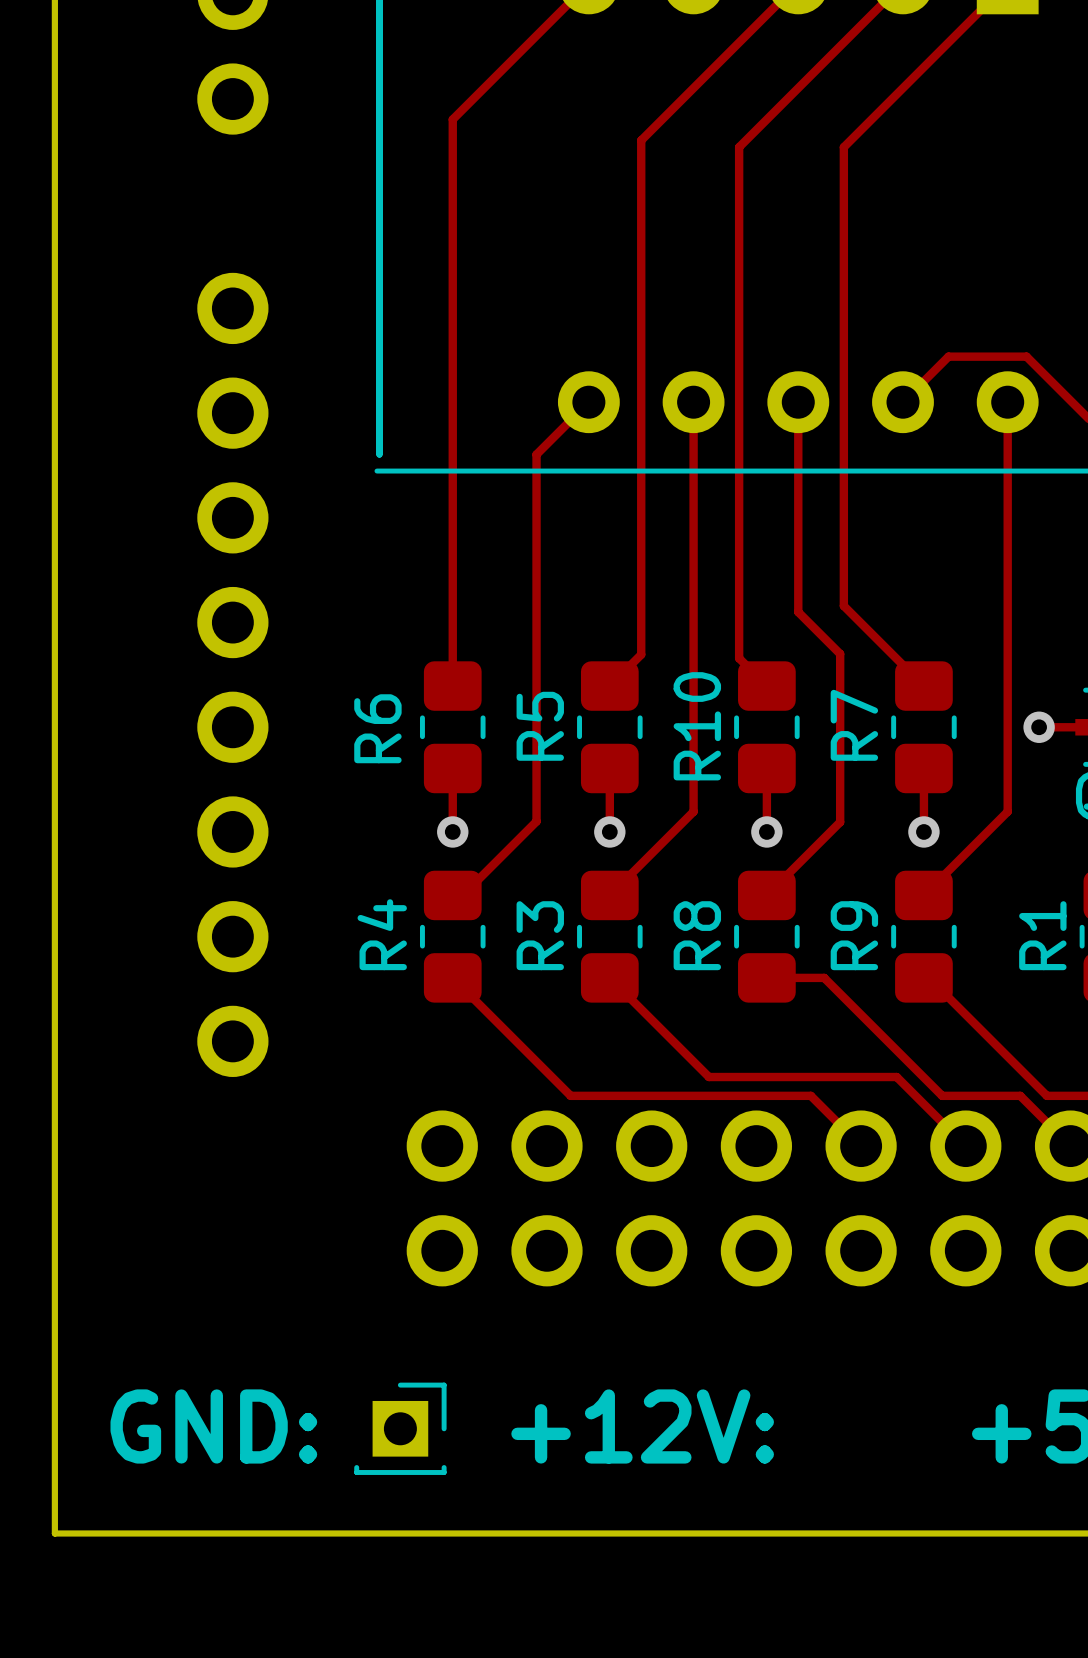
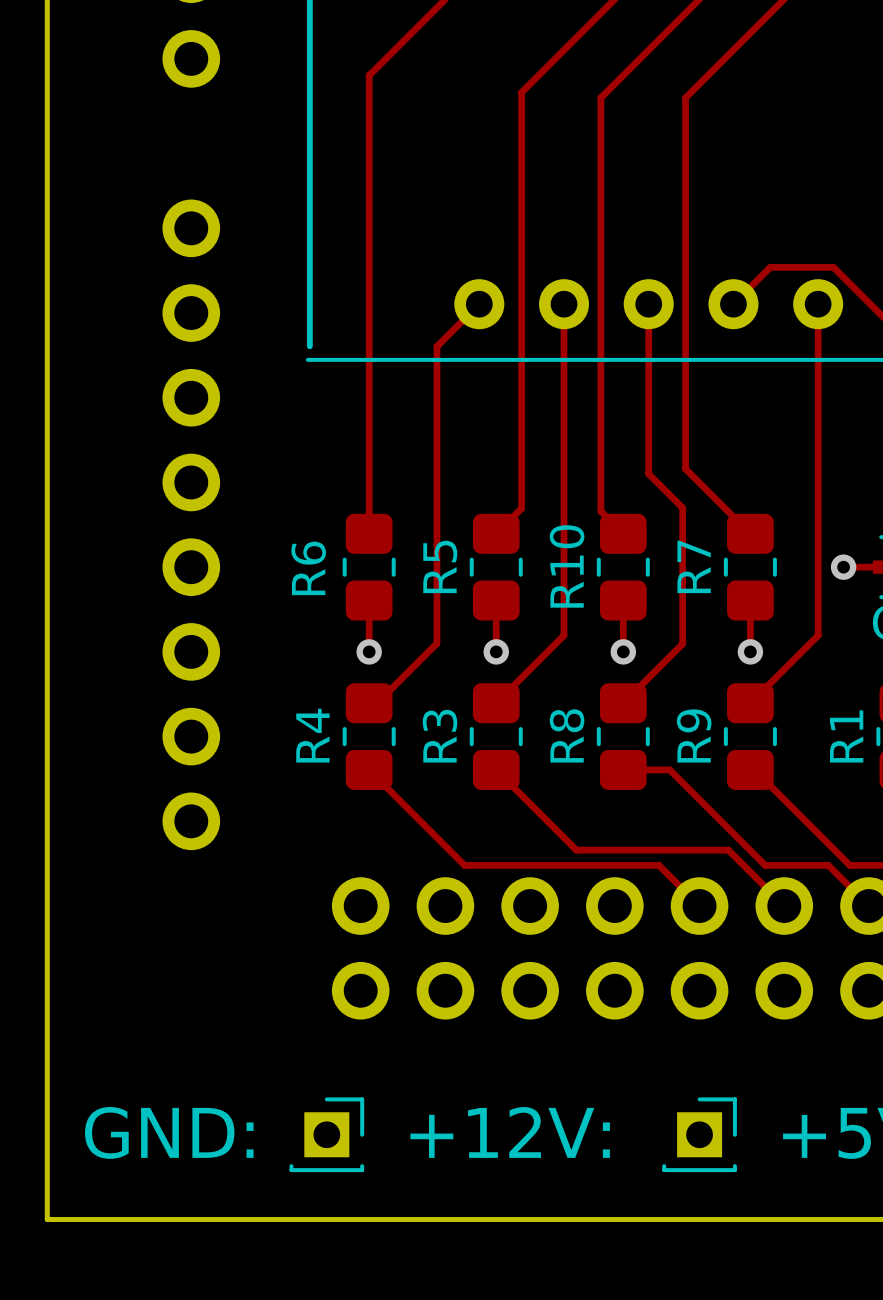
part: none -> (699, 1134)

